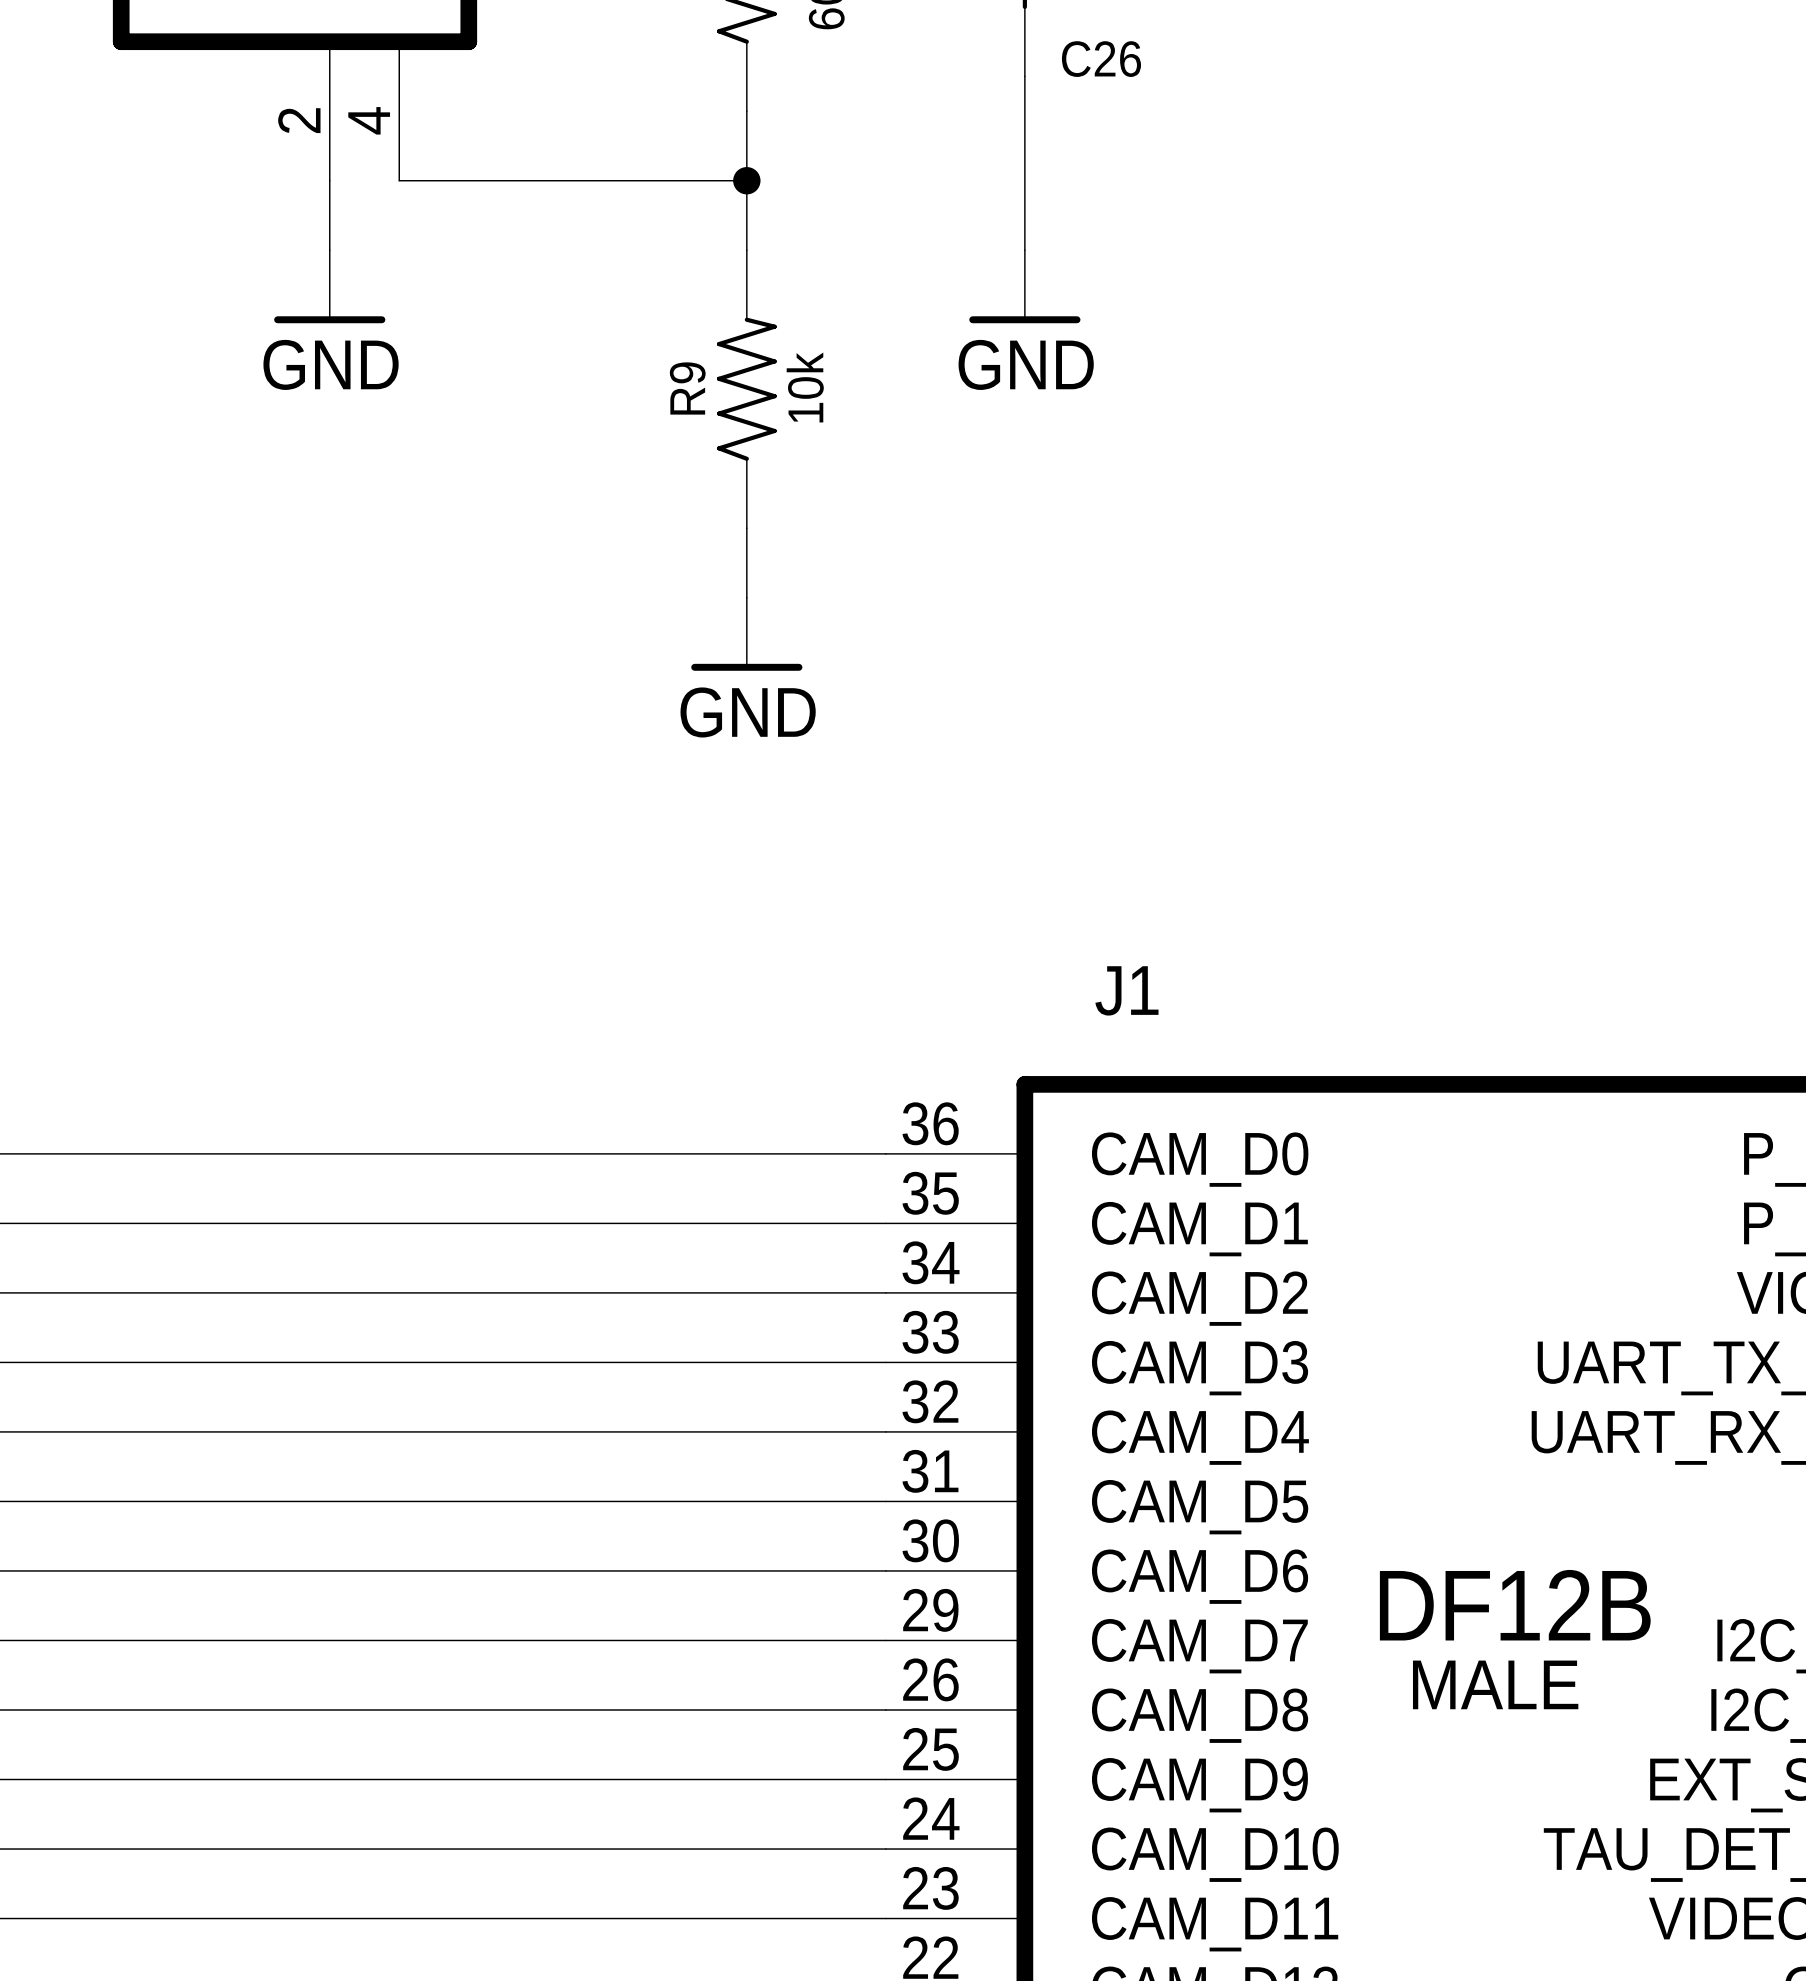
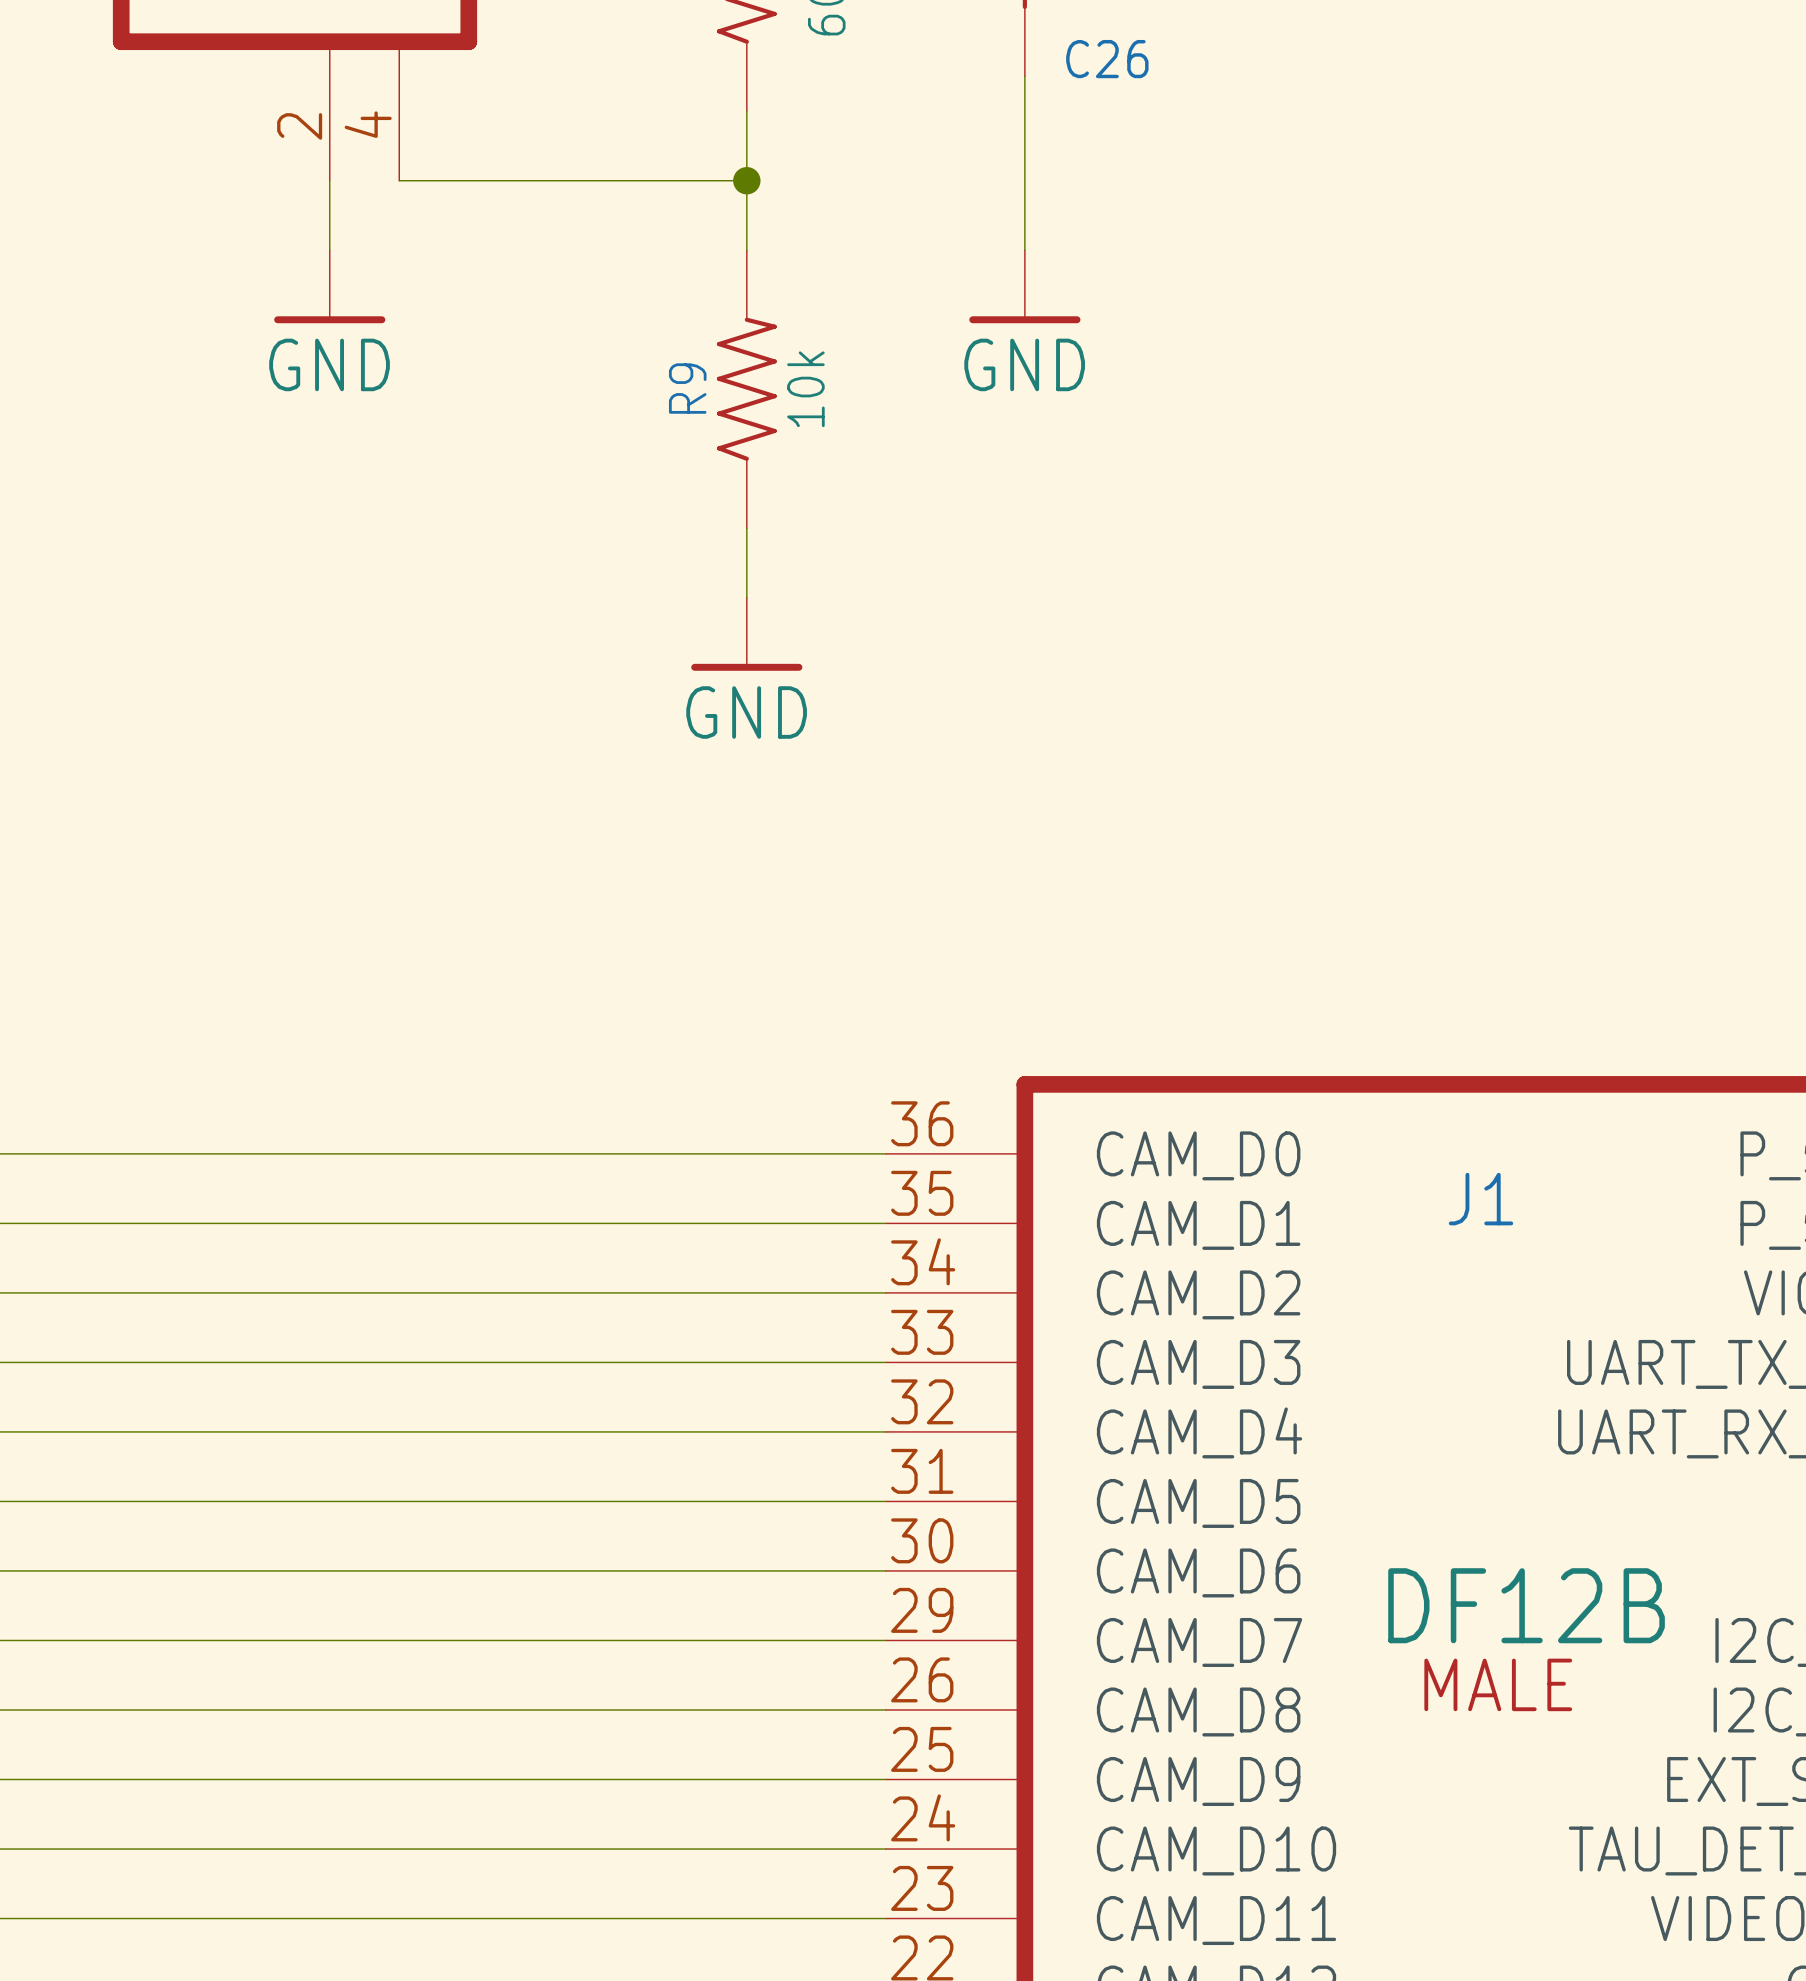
J1 name position: J1 (1126, 990) -> J1 (1481, 1199)

